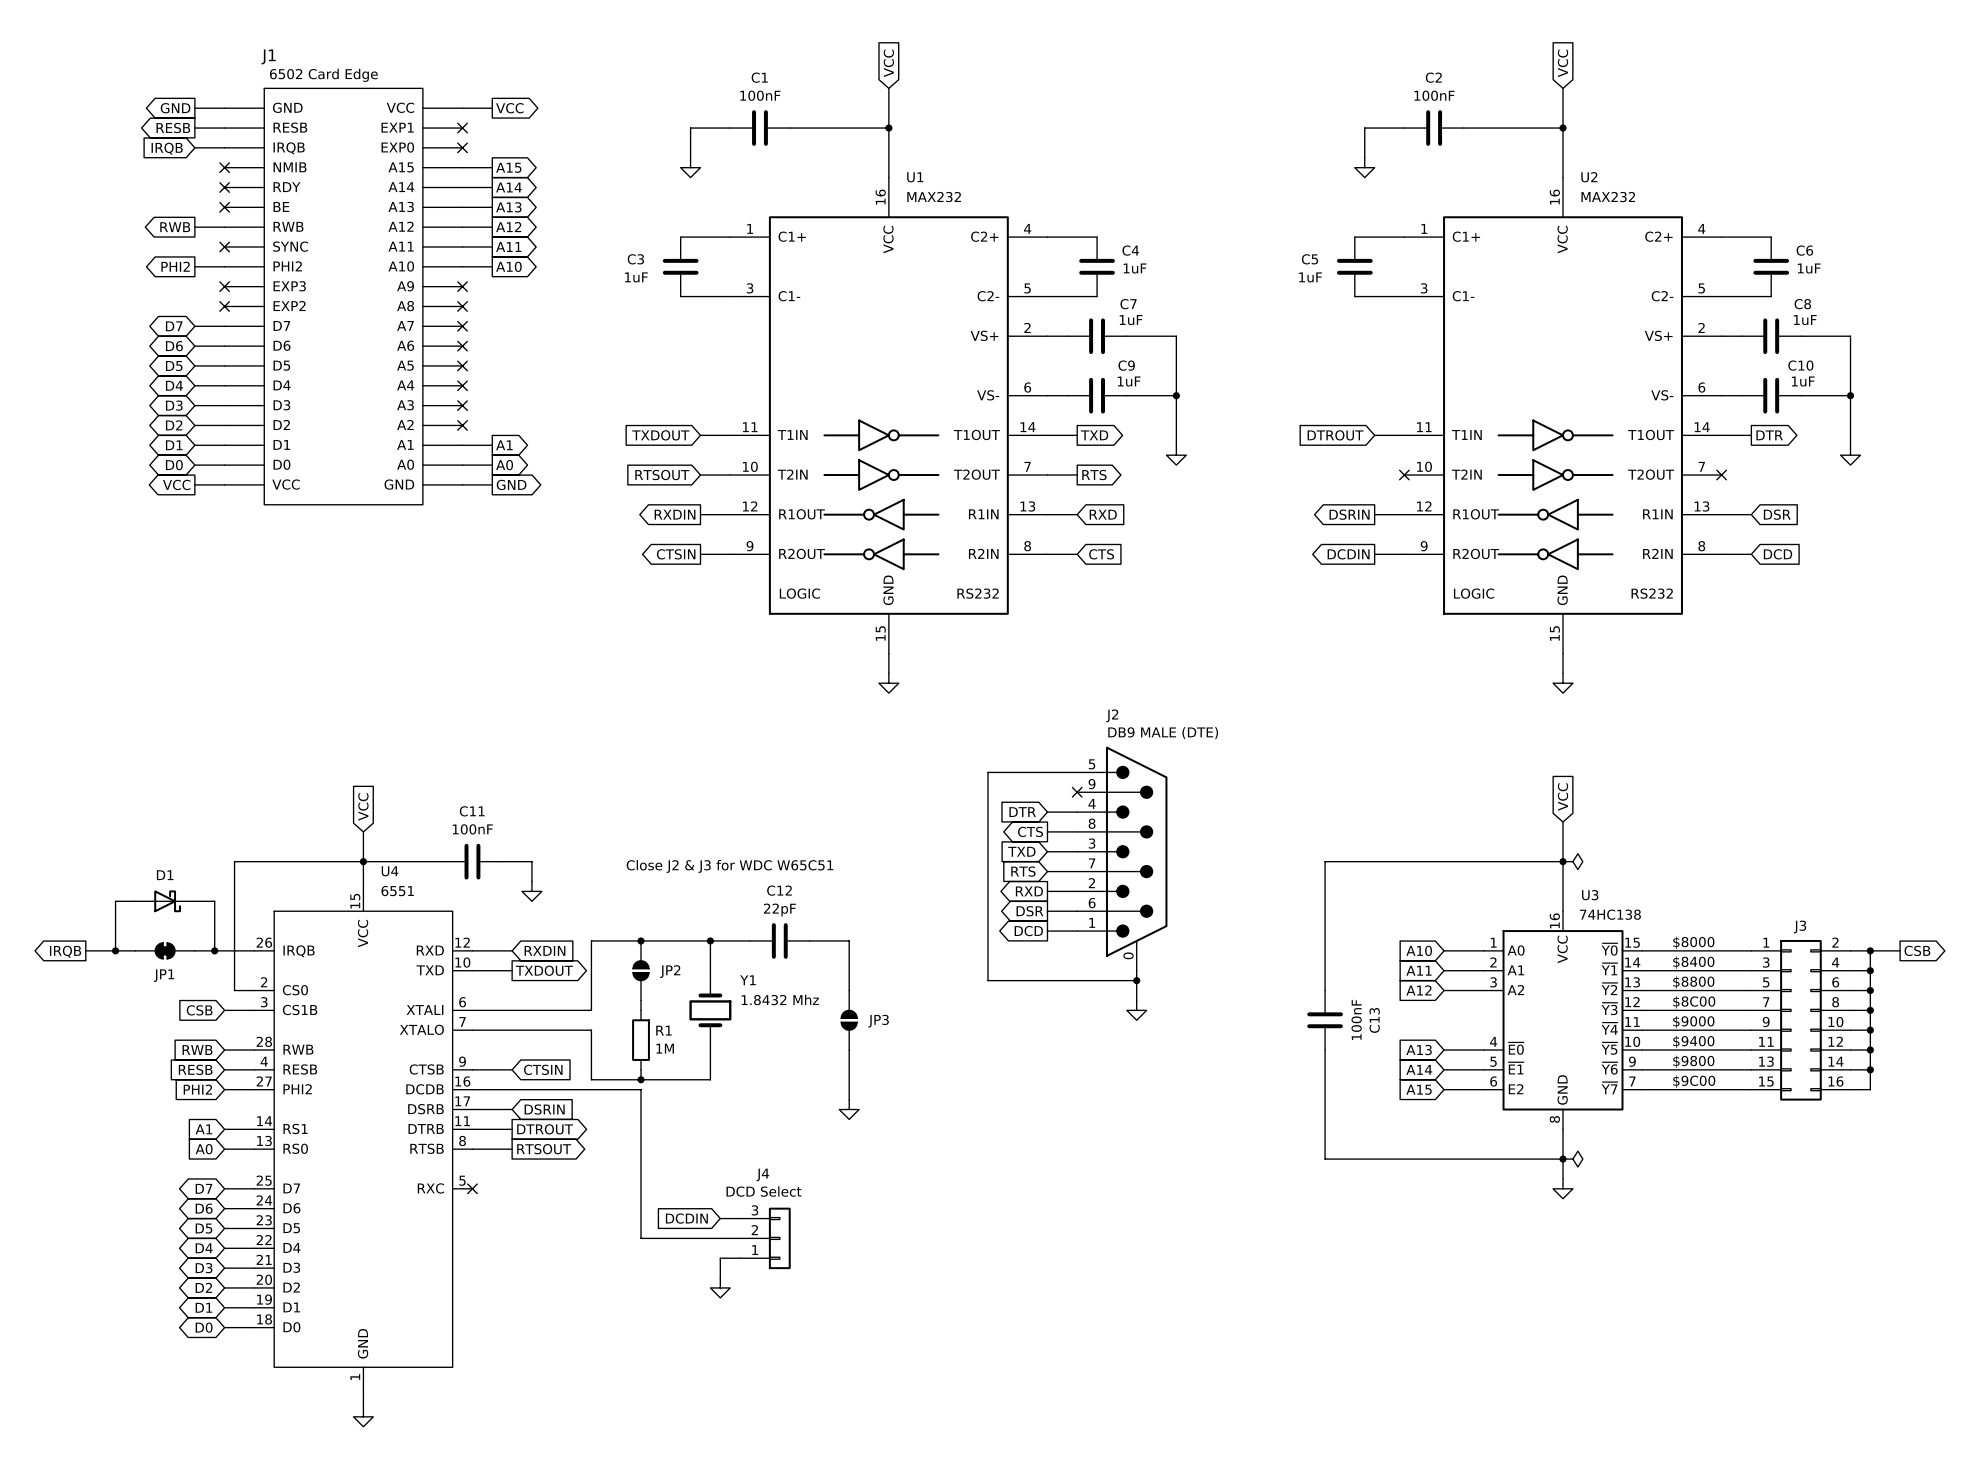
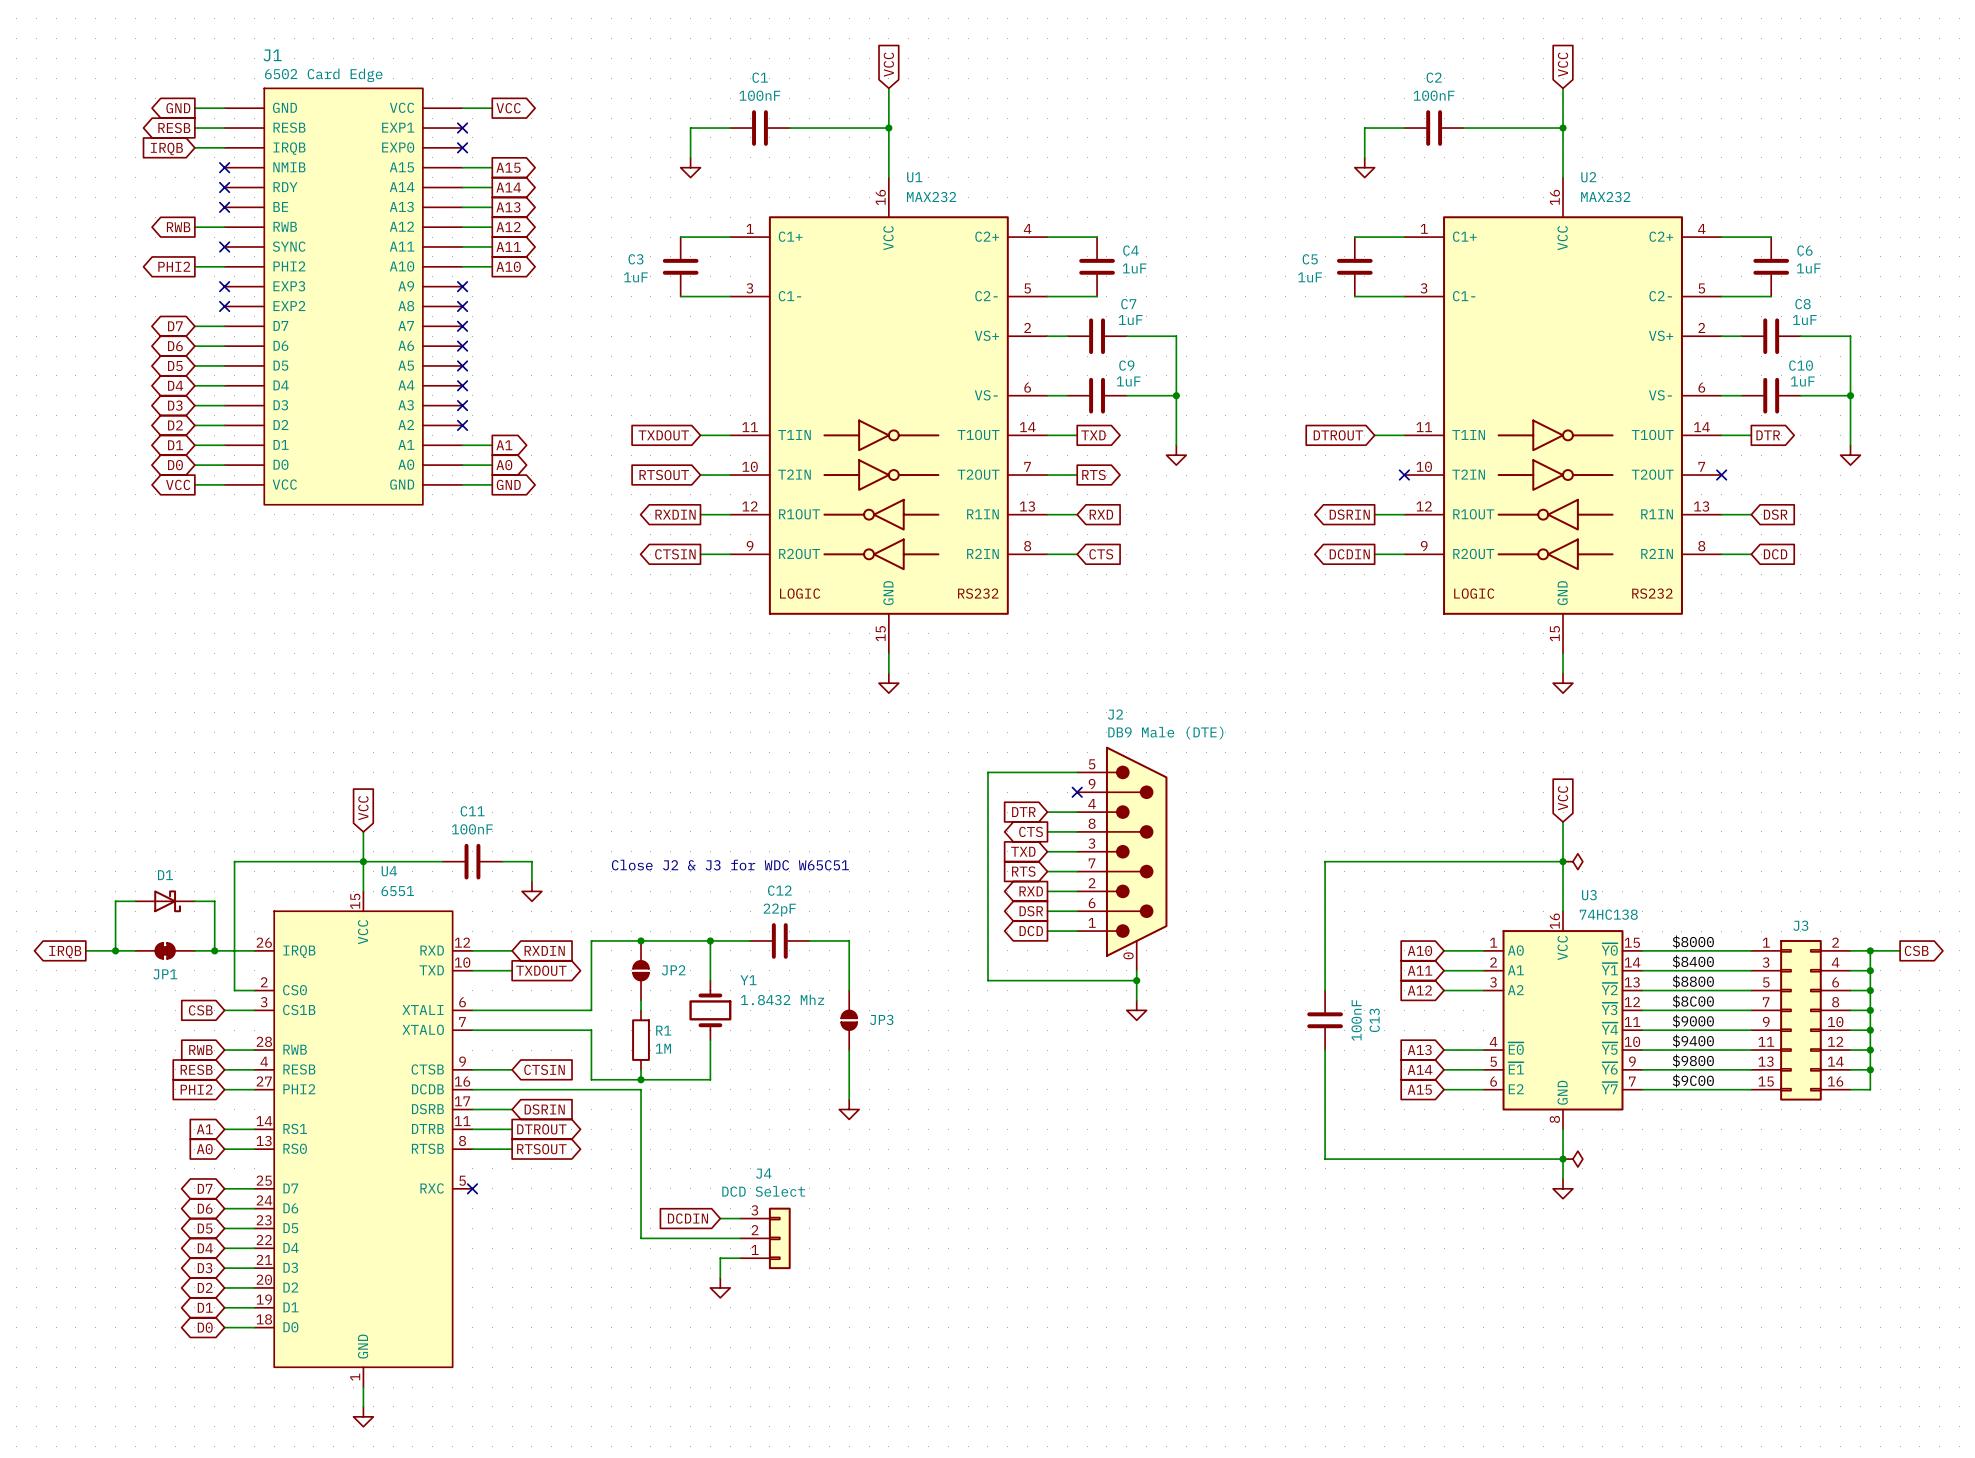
J2 value: DB9 MALE (DTE) (1163, 733) -> DB9 Male (DTE) (1165, 732)

